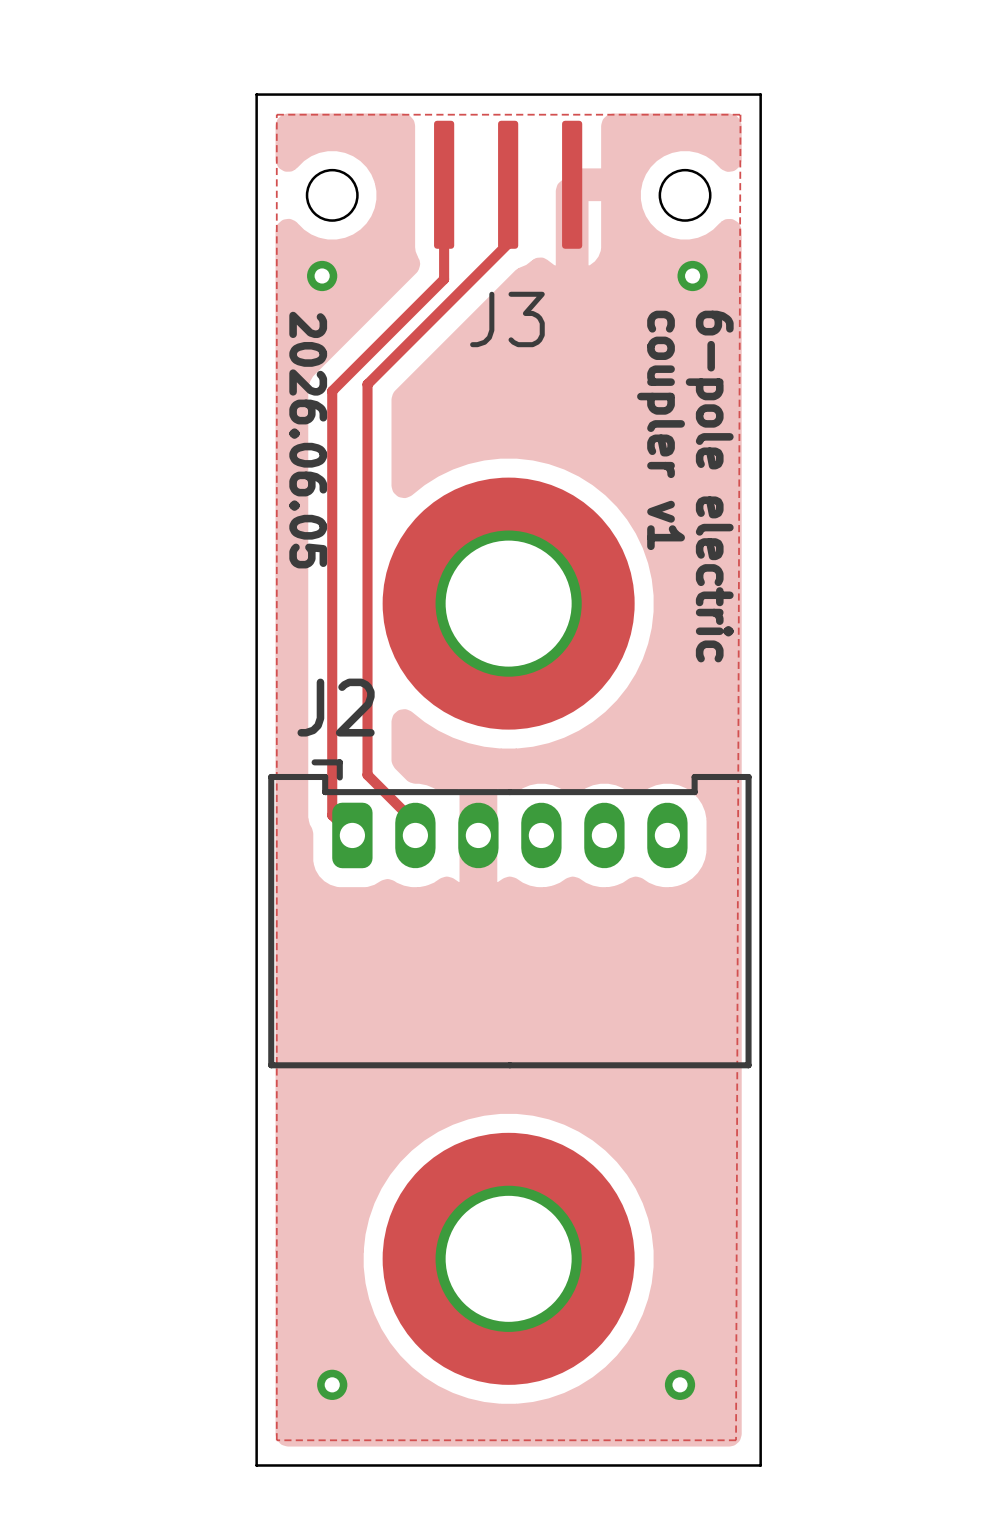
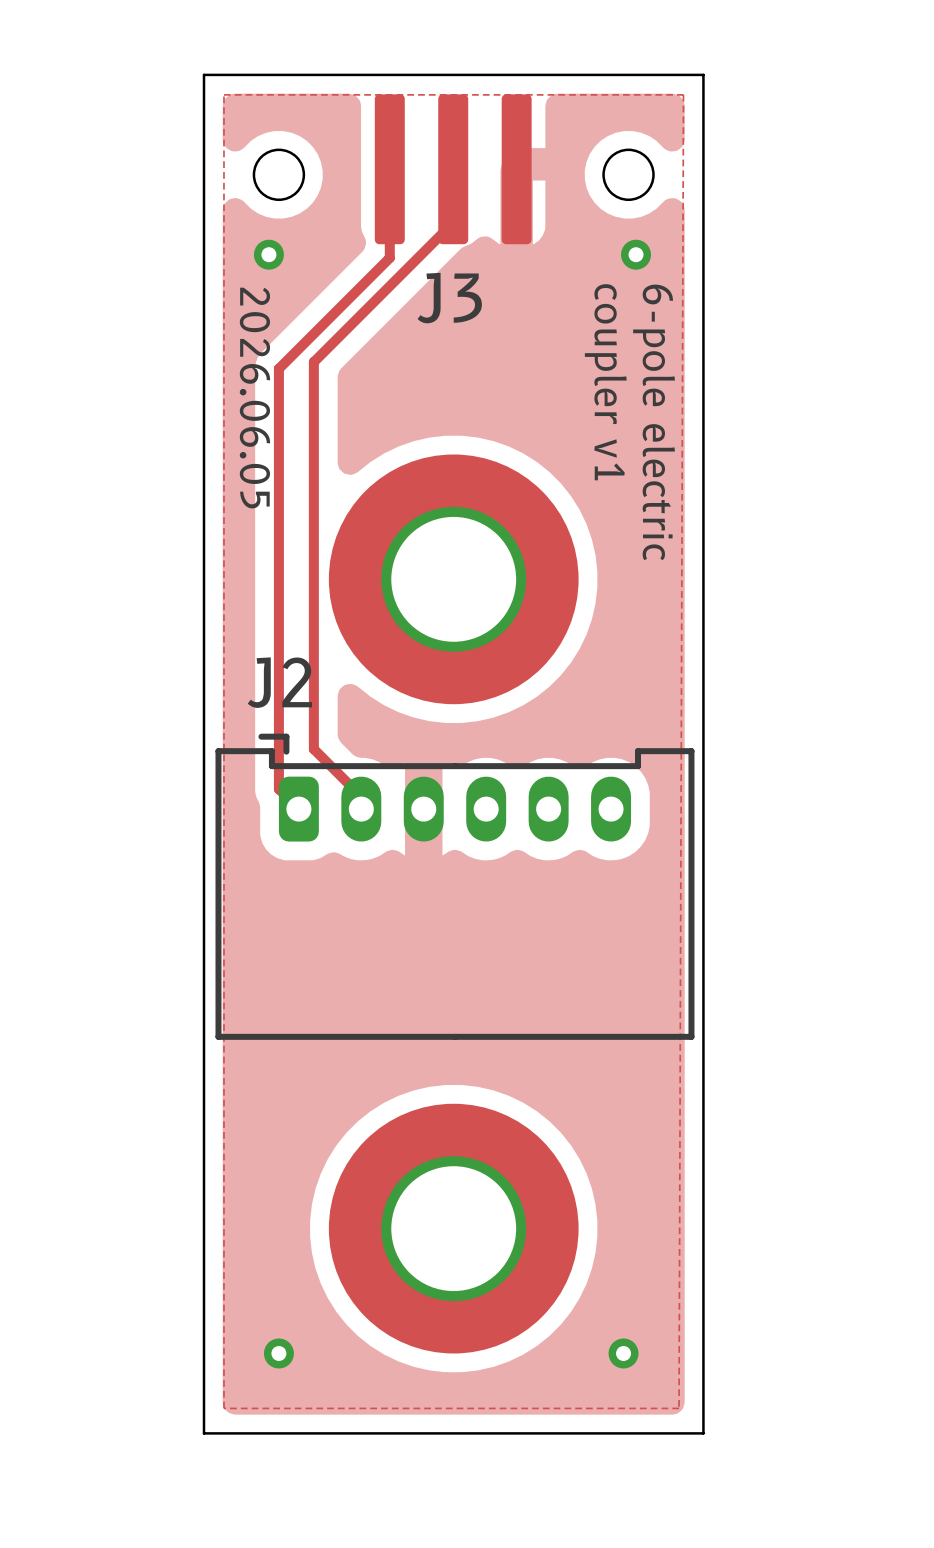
part footprint: [434, 120, 583, 249] -> [374, 94, 532, 245]

